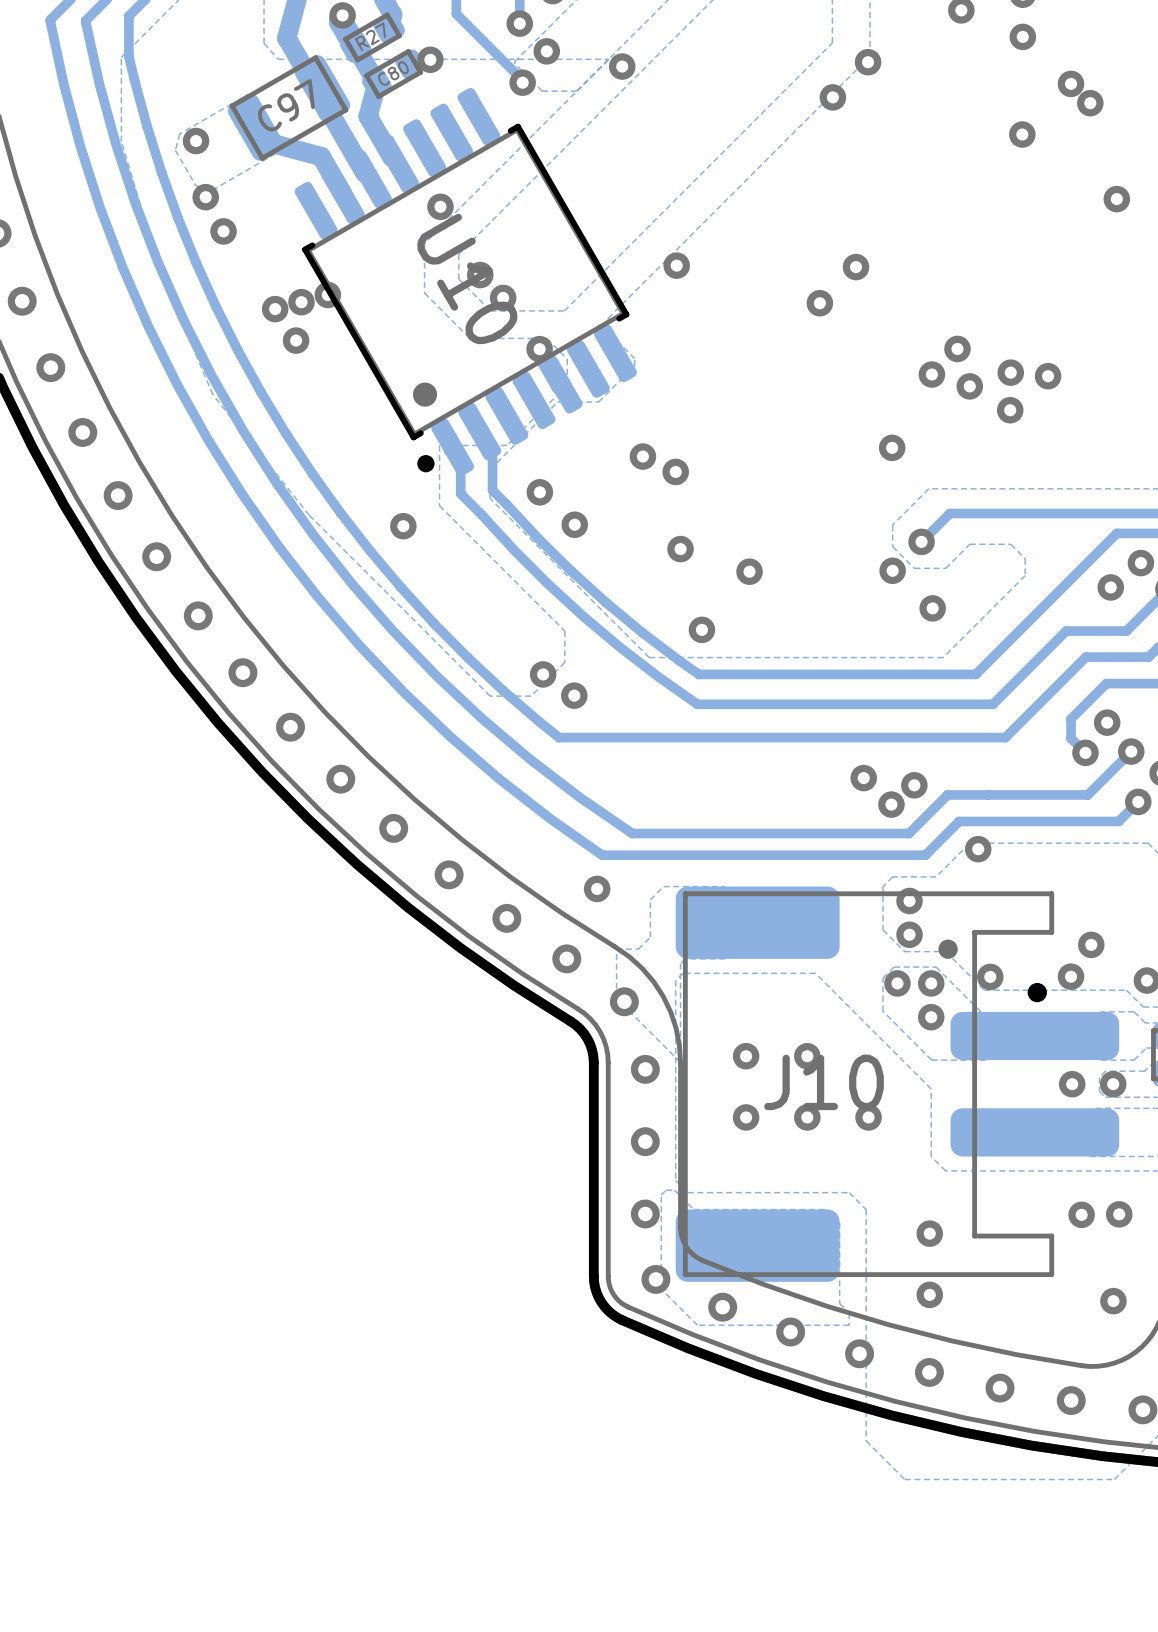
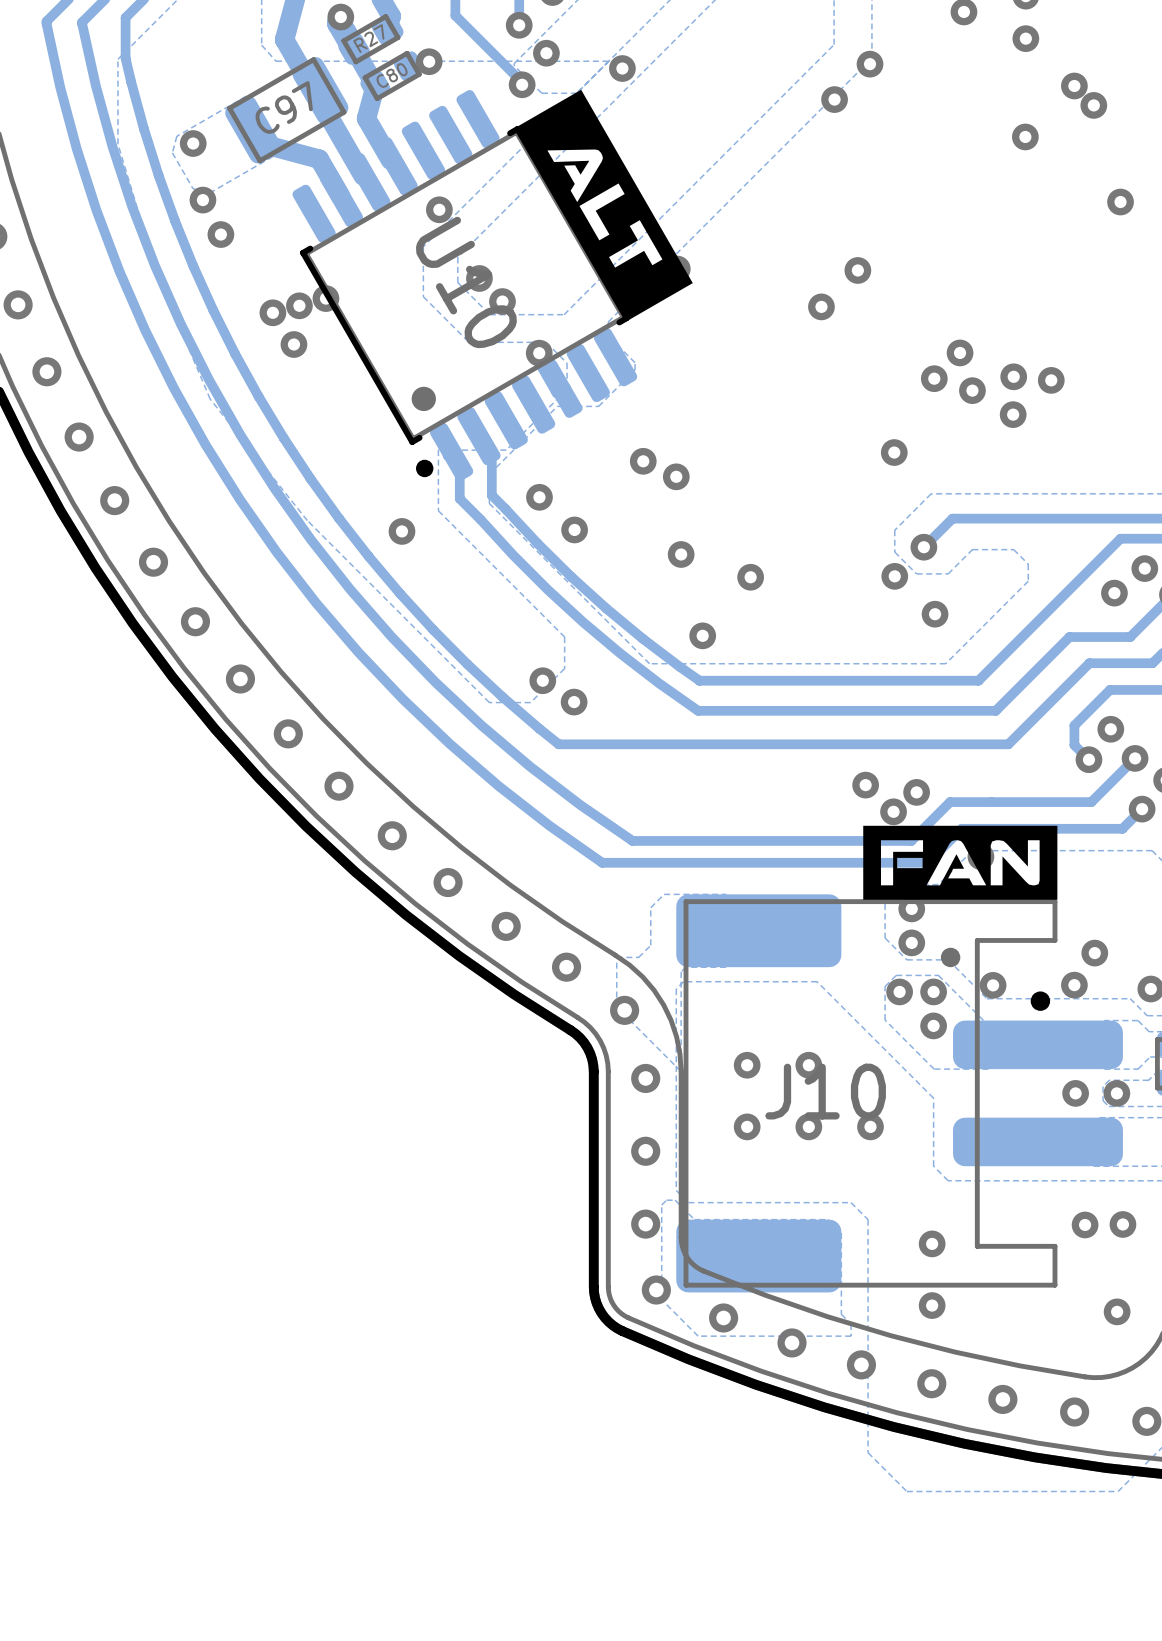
drawing: none -> [517, 89, 693, 321]
drawing: none -> [863, 825, 1058, 900]
via: (597, 888) -> none

